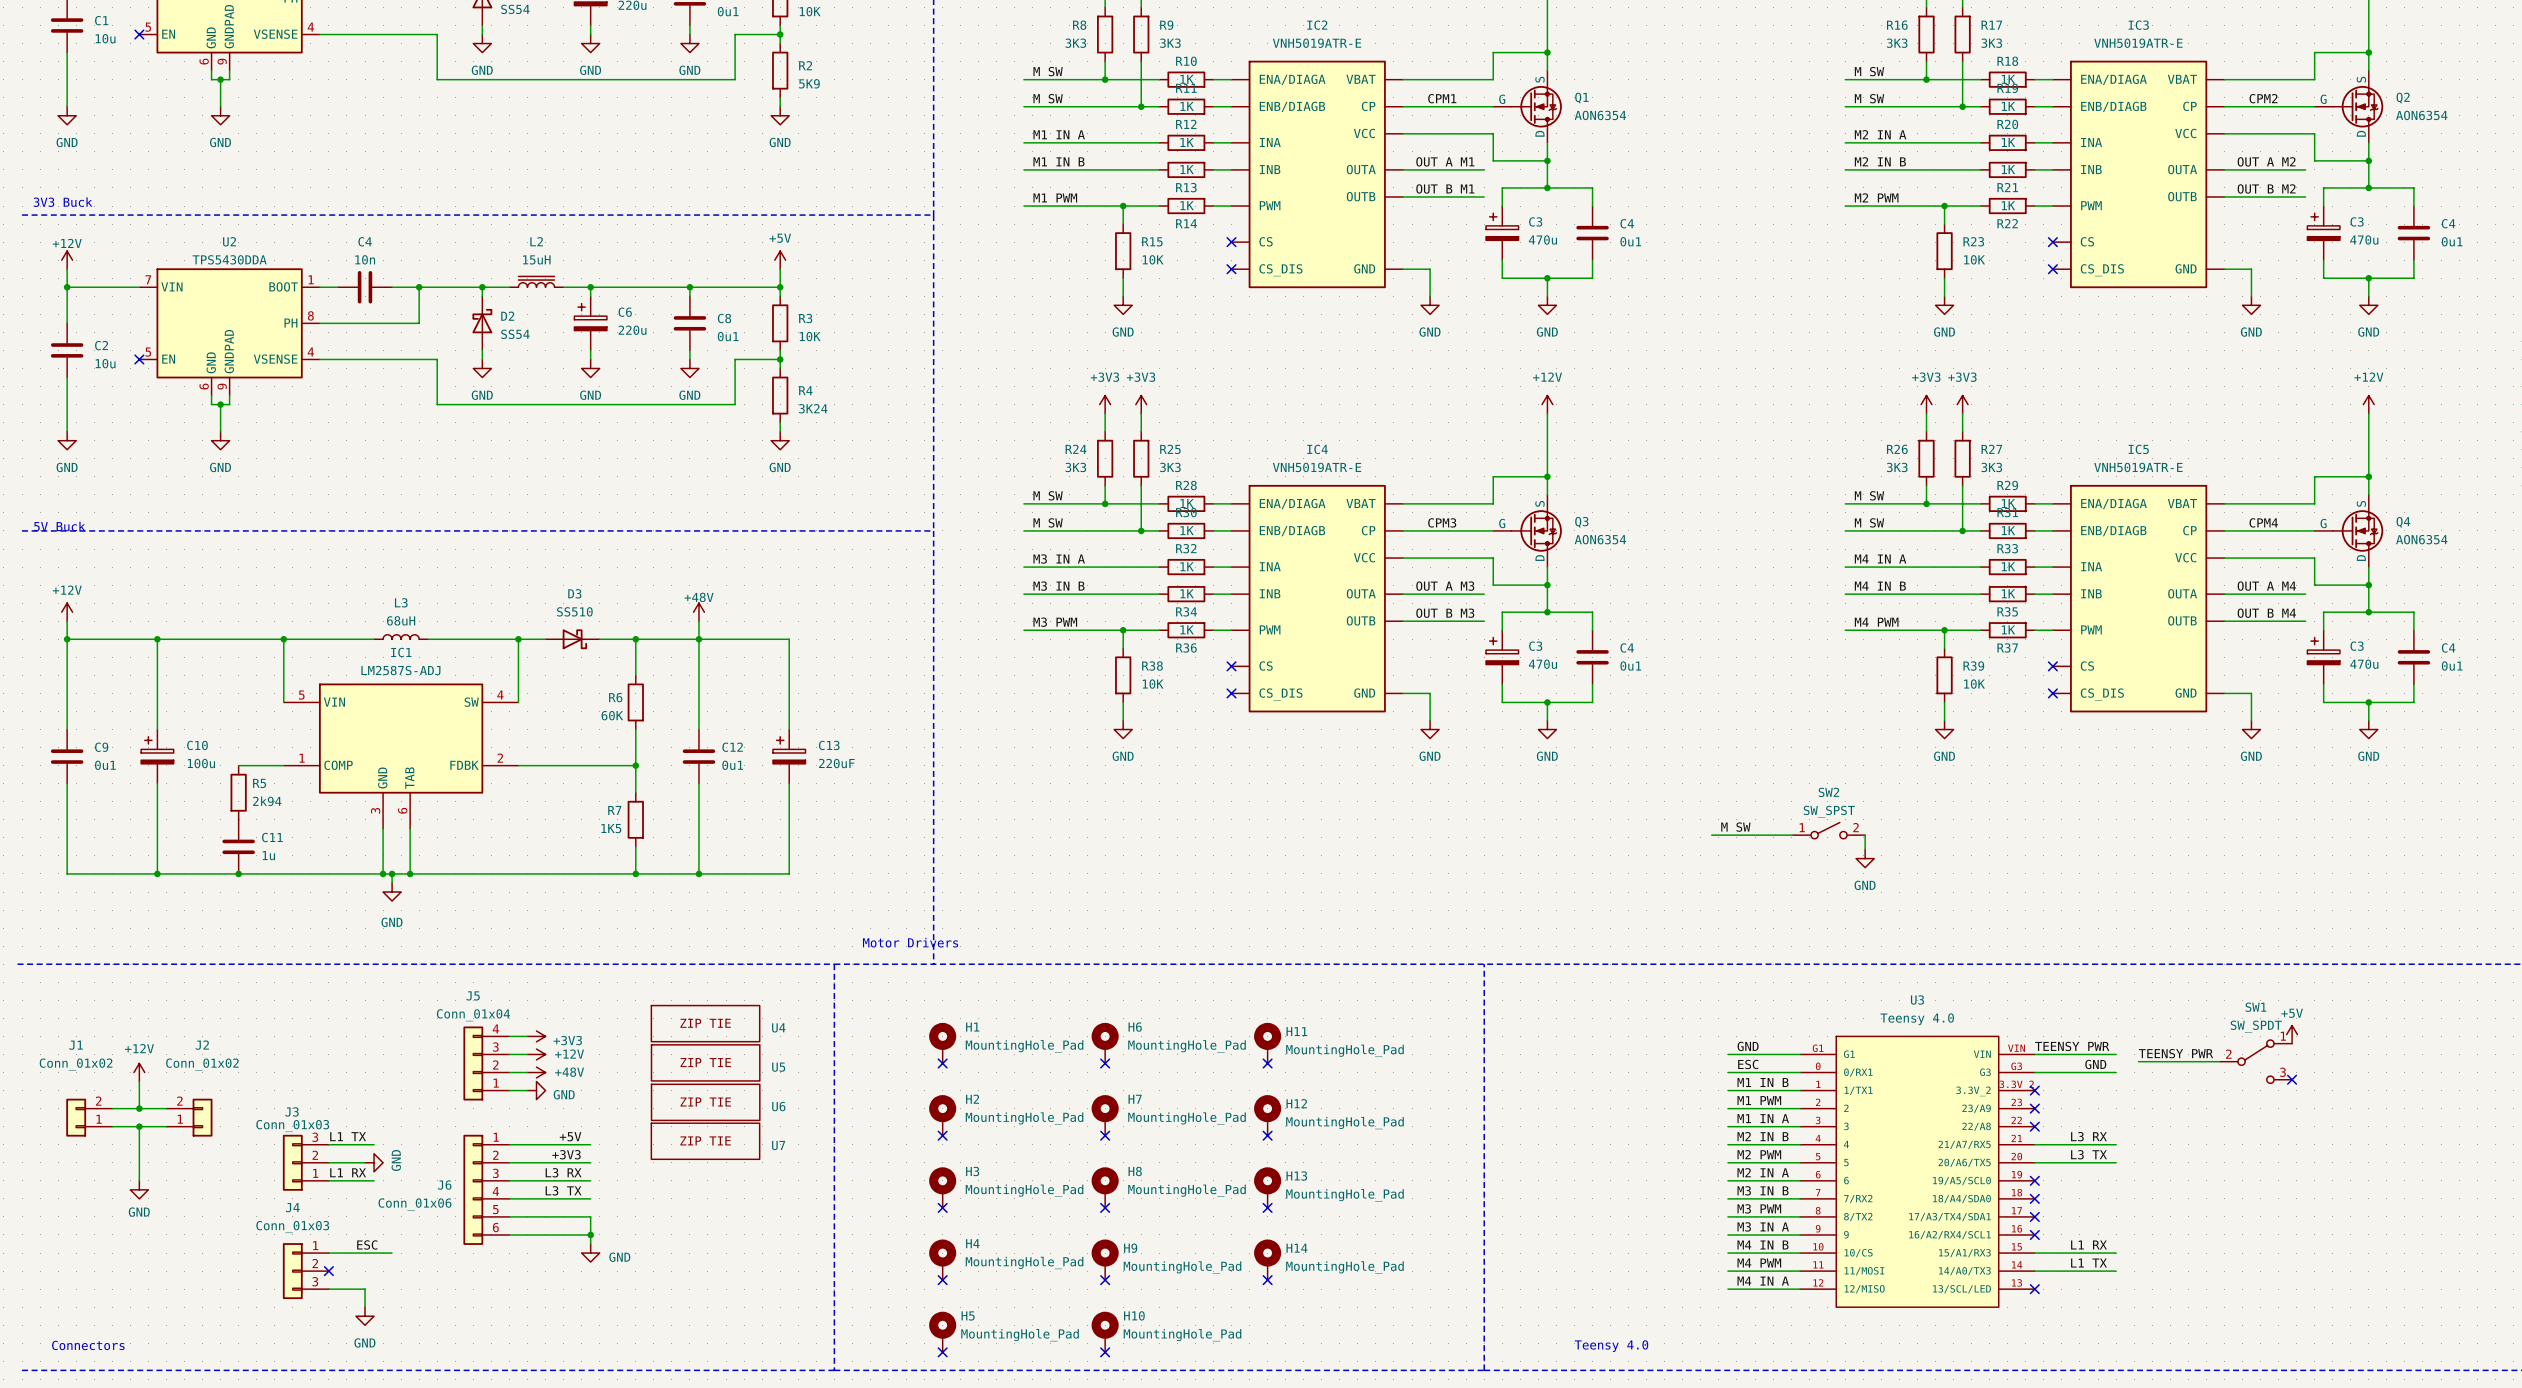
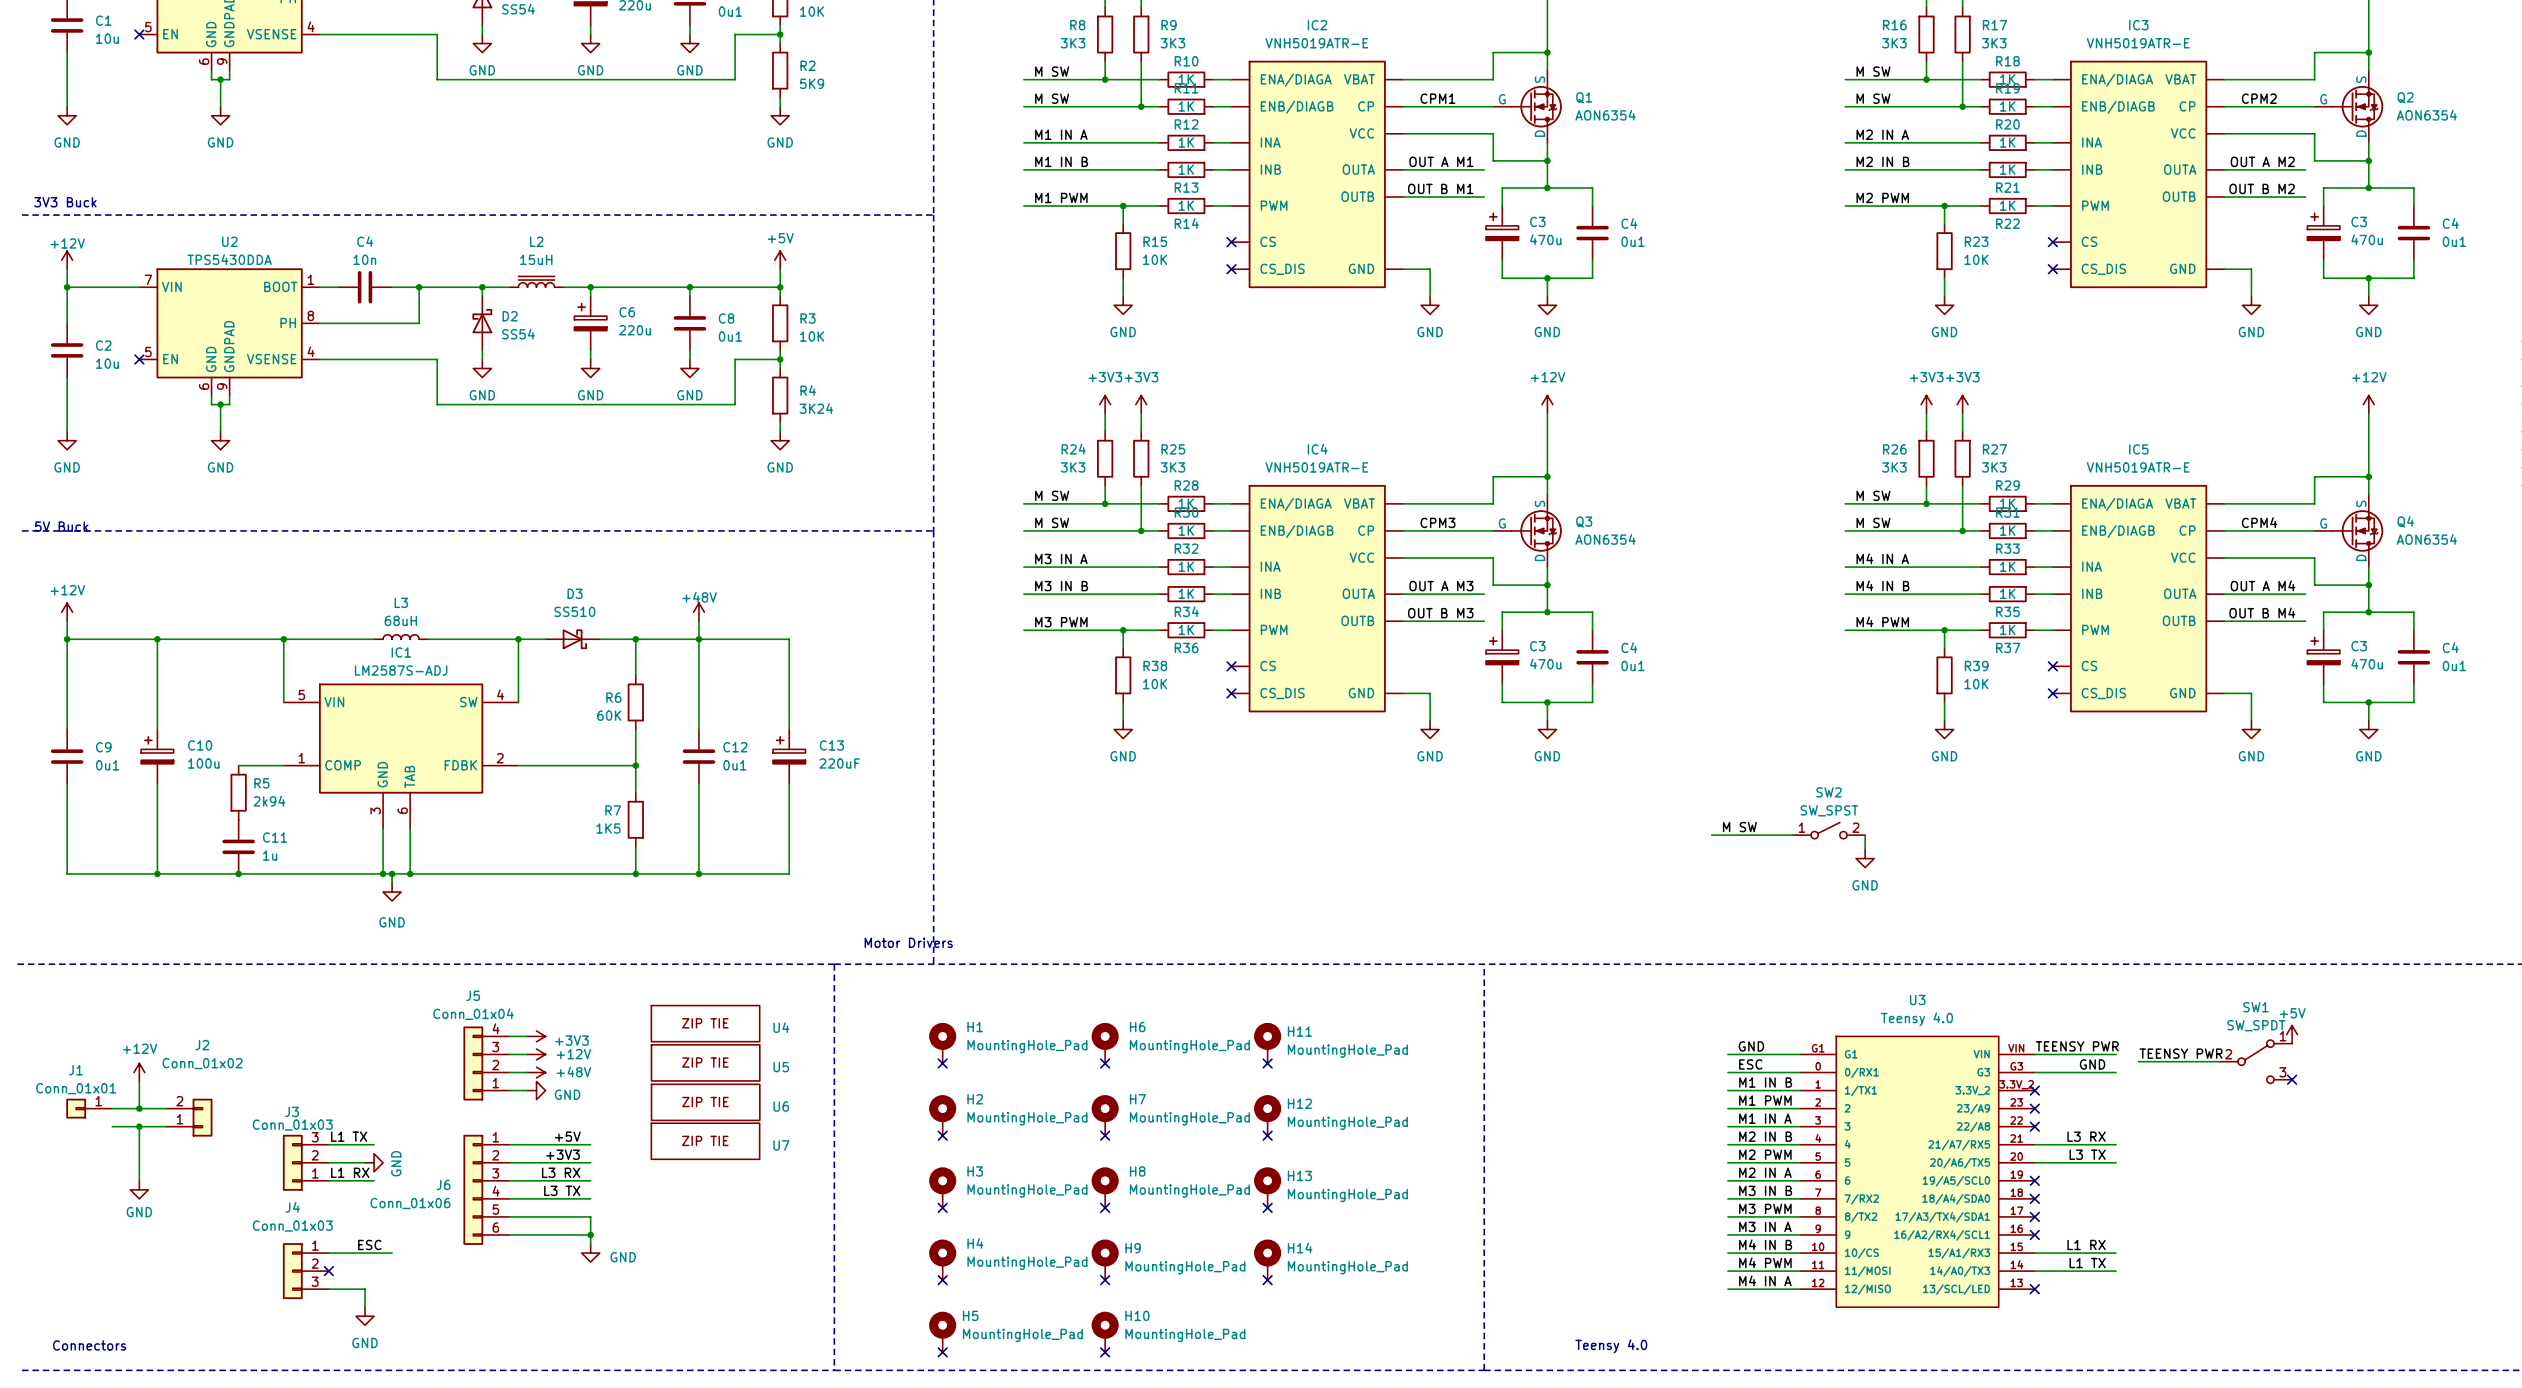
J1 name position: J1 (76, 1045) -> J1 (75, 1070)
J1 value: Conn_01x02 (76, 1064) -> Conn_01x01 (76, 1088)
J1 symbol: [66, 1098, 113, 1137] -> [66, 1098, 113, 1119]

